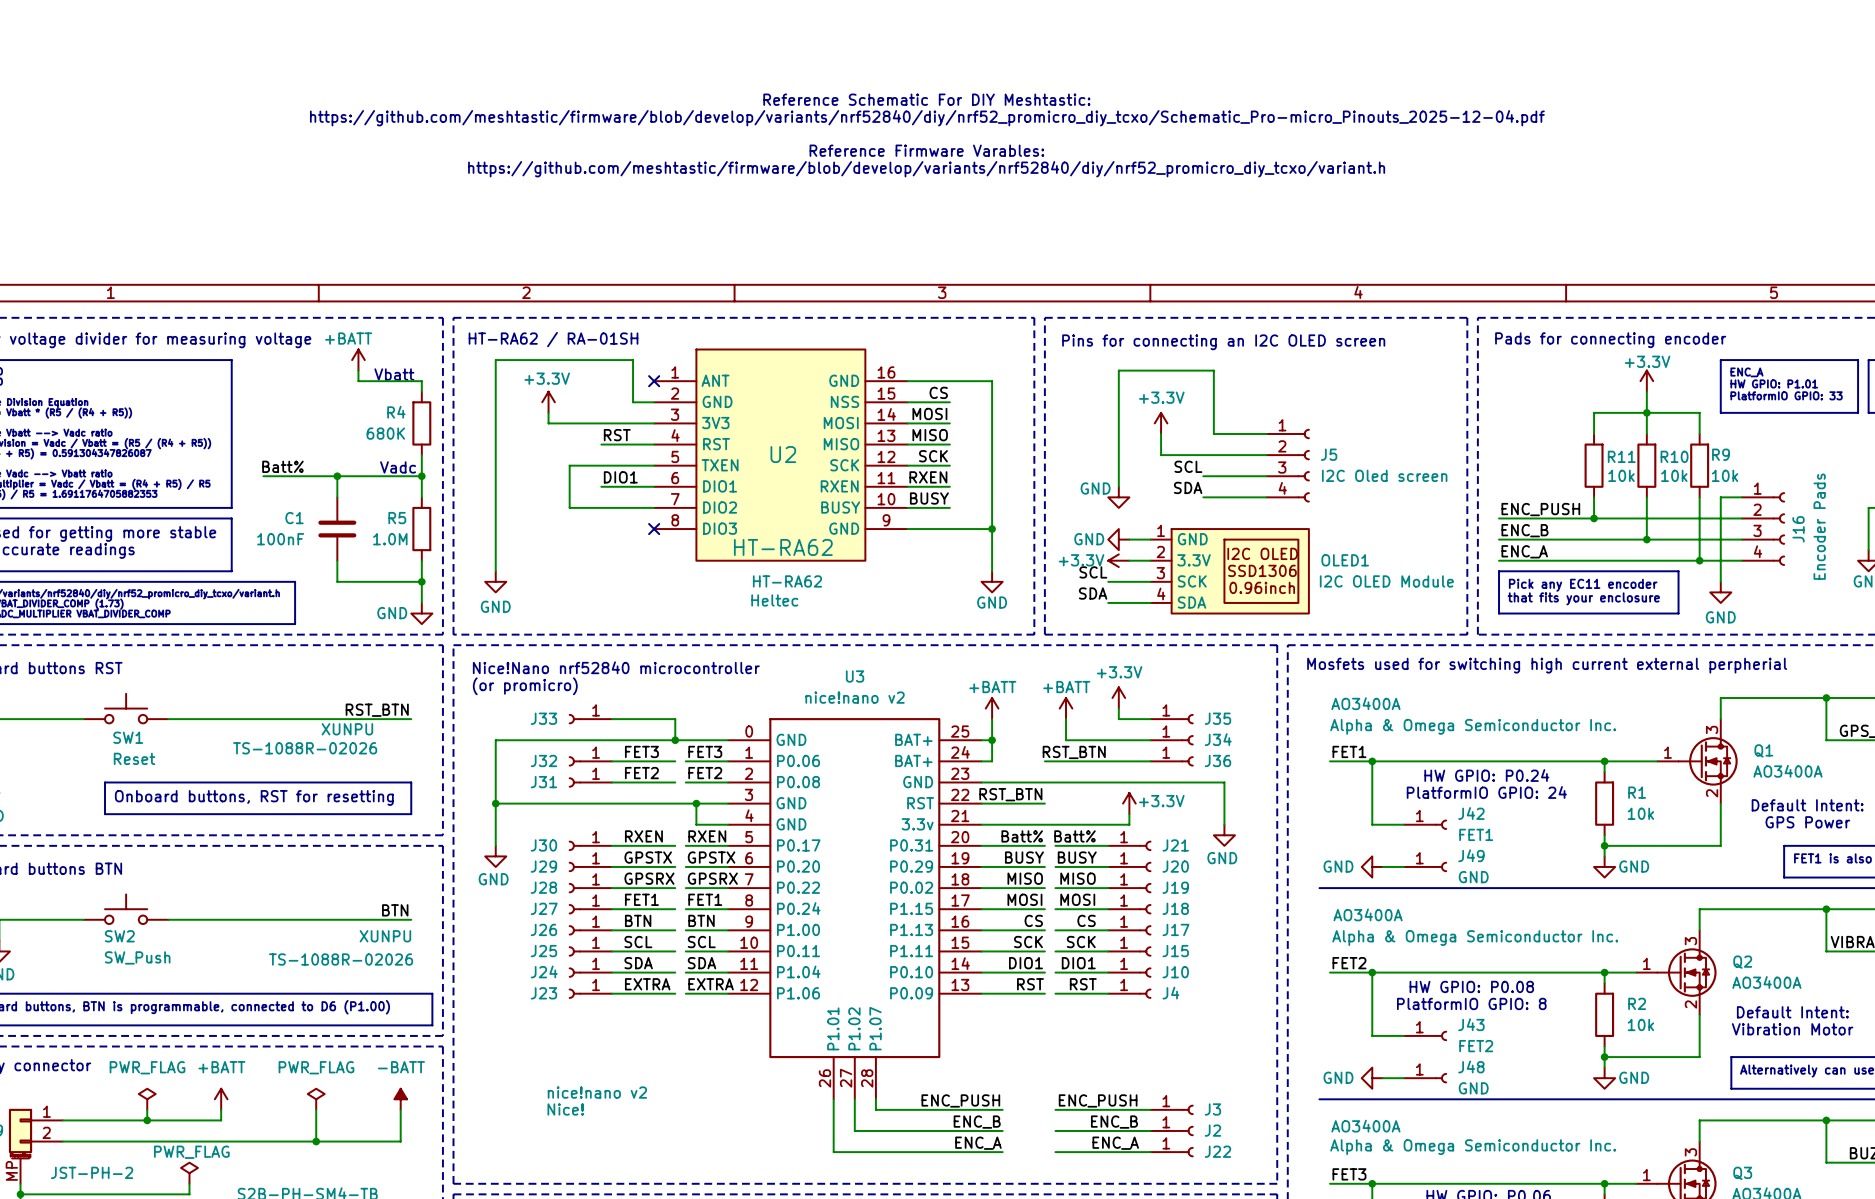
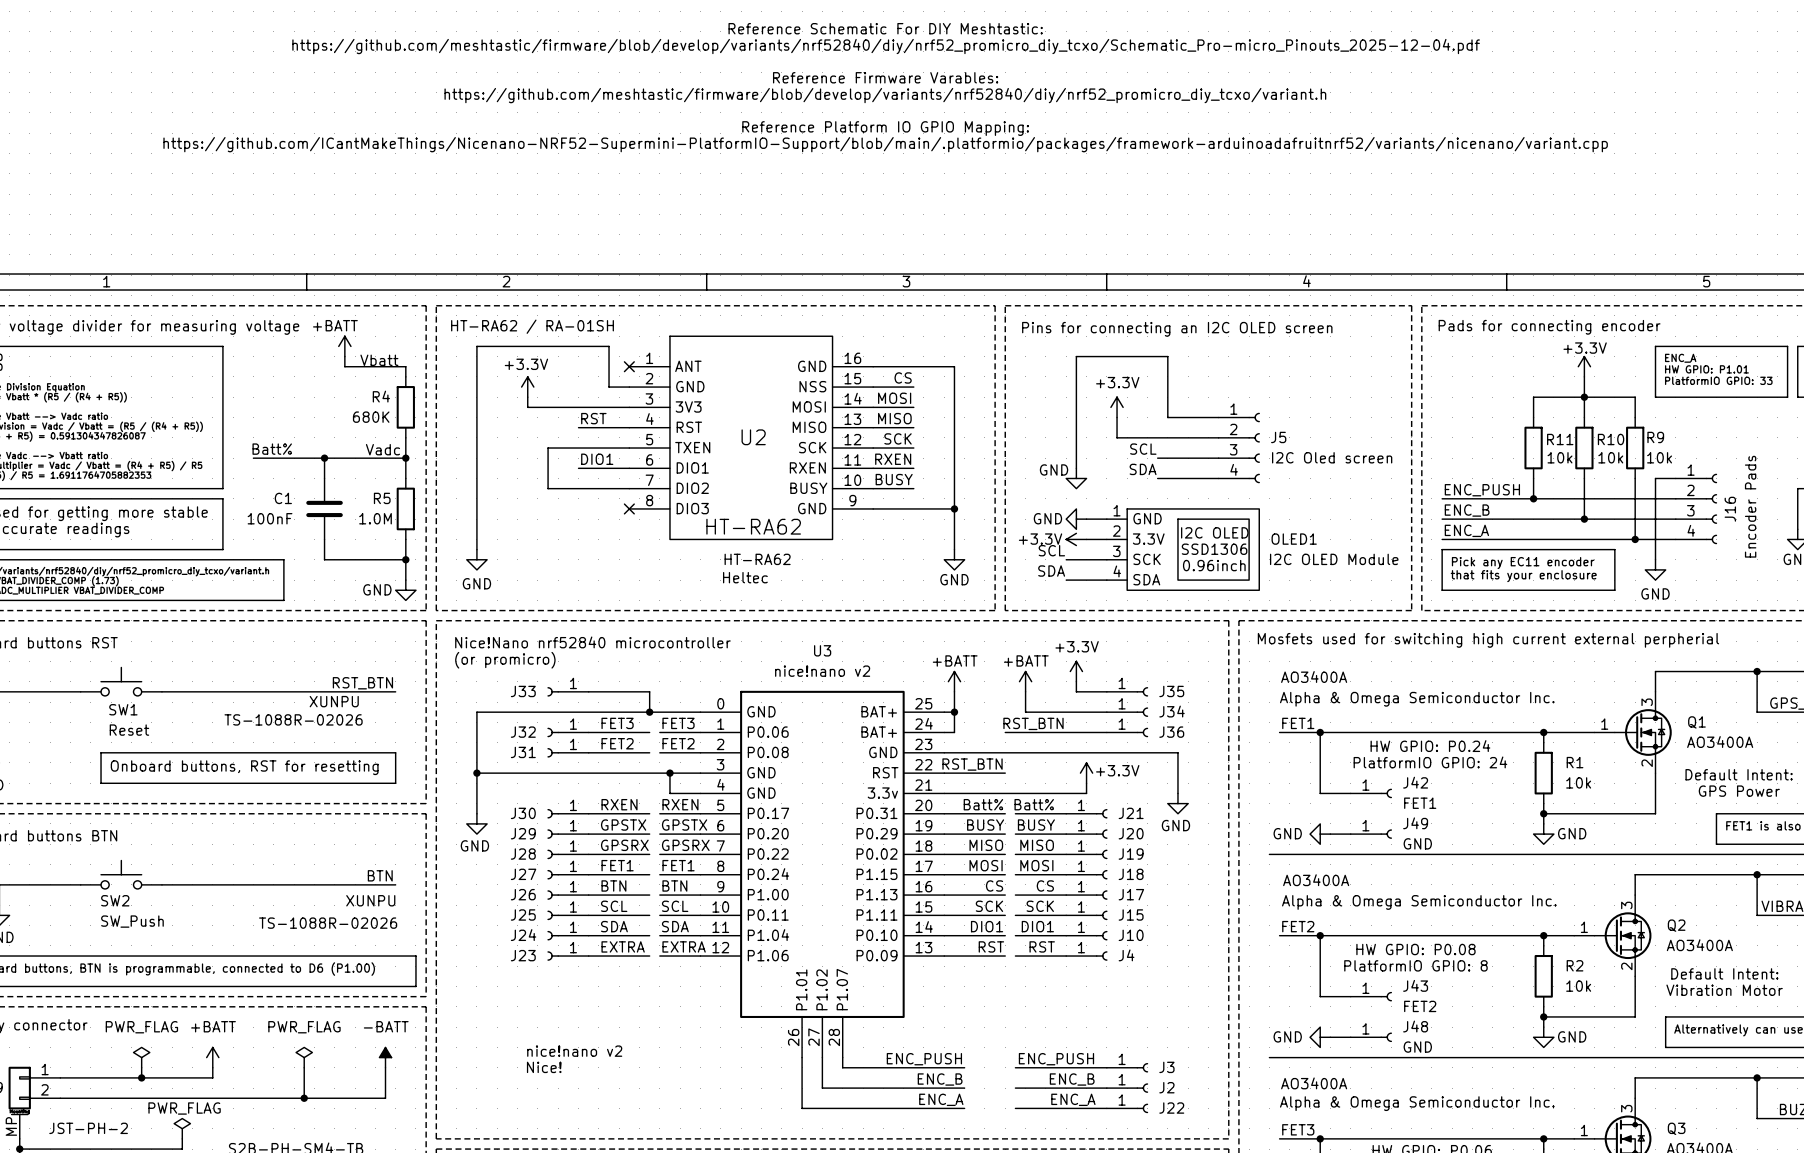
text position: Reference Schematic For DIY Meshtastic: (926, 99) -> Reference Schematic For DIY Meshtastic: (885, 28)
text position: https://github.com/meshtastic/firmware/blob/develop/variants/nrf52840/diy/nrf52_promicro_diy_tcxo/Schematic_Pro-micro_Pinouts_2025-12-04.pdf (927, 118) -> https://github.com/meshtastic/firmware/blob/develop/variants/nrf52840/diy/nrf52_promicro_diy_tcxo/Schematic_Pro-micro_Pinouts_2025-12-04.pdf (886, 46)
text: none -> Reference Platform IO GPIO Mapping: (885, 128)
text: none -> https://github.com/ICantMakeThings/Nicenano-NRF52-Supermini-PlatformIO-Support/blob/main/.platformio/packages/framework-arduinoadafruitnrf52/variants/nicenano/variant.cpp (885, 144)
text position: Reference Firmware Varables: (926, 150) -> Reference Firmware Varables: (885, 77)
text position: https://github.com/meshtastic/firmware/blob/develop/variants/nrf52840/diy/nrf52_promicro_diy_tcxo/variant.h (926, 169) -> https://github.com/meshtastic/firmware/blob/develop/variants/nrf52840/diy/nrf52_promicro_diy_tcxo/variant.h (885, 95)

